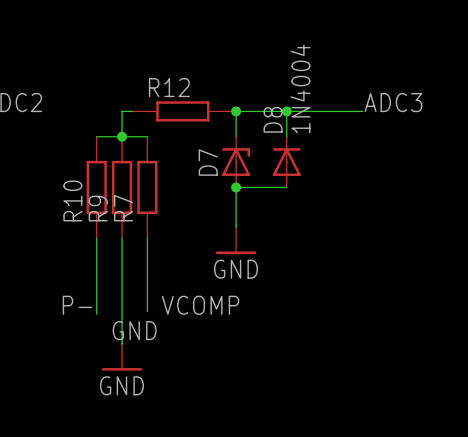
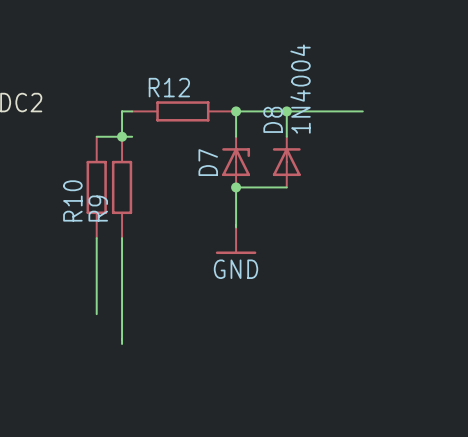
label: ADC3 (393, 102) -> none
wire: (132, 136) (147, 136) -> none
R7: (147, 187) -> none
wire: (147, 238) (147, 311) -> none
label: P- (77, 305) -> none
label: VCOMP (200, 305) -> none
label: GND (134, 330) -> none
power symbol: GND (122, 357) -> none

